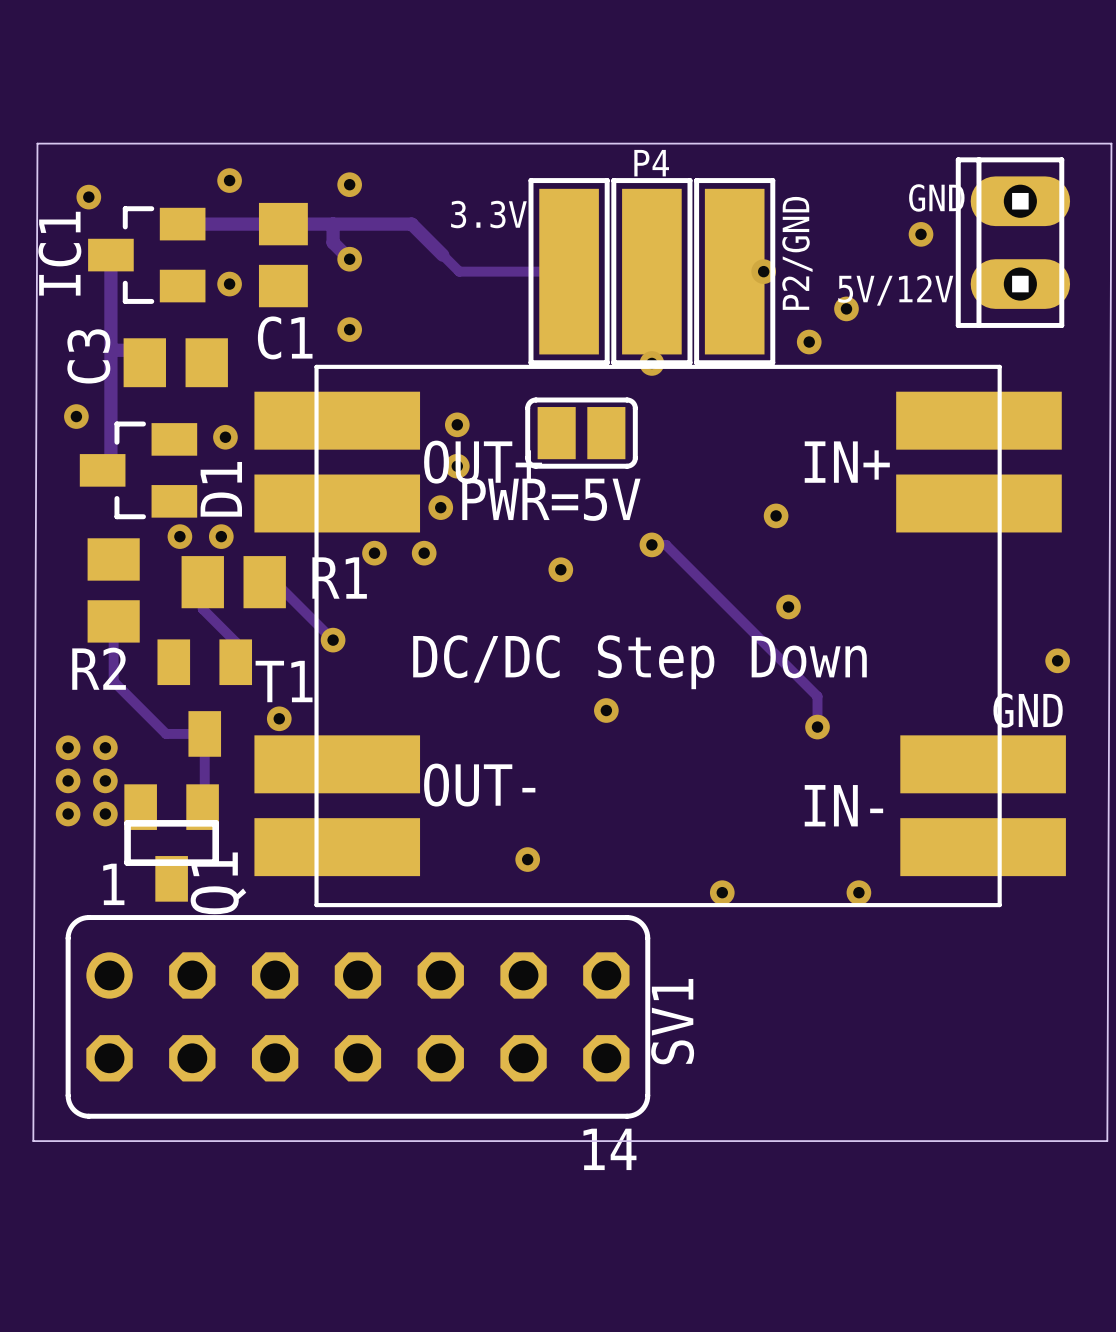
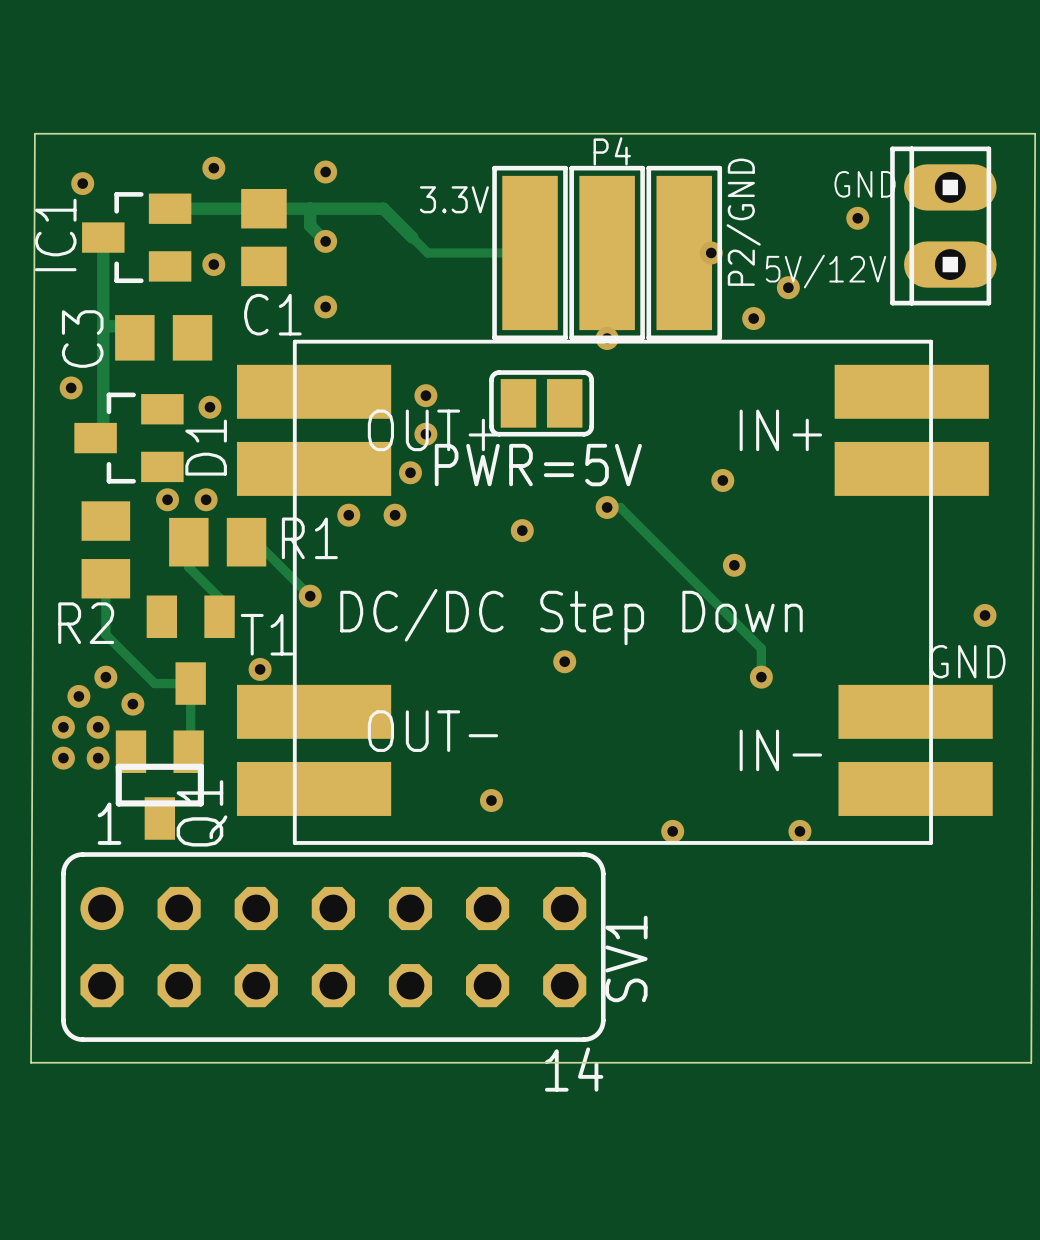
via: none -> (105, 677)
via: (68, 747) -> none
via: none -> (78, 696)
via: (105, 747) -> none
via: none -> (132, 704)

